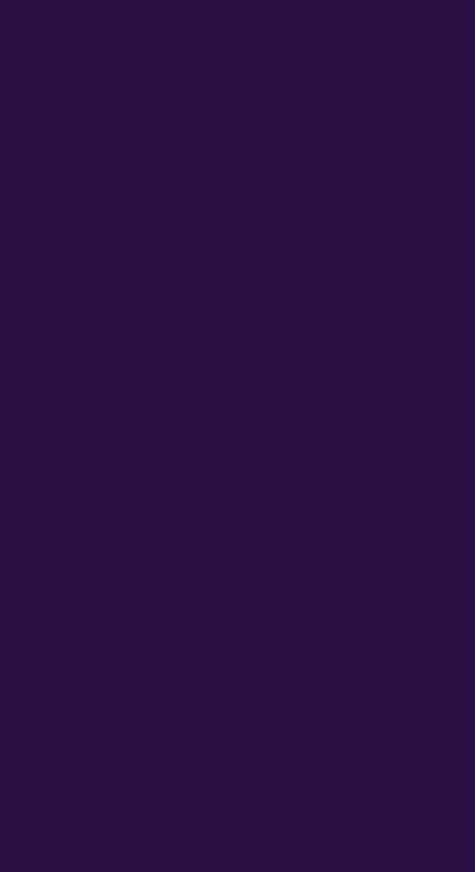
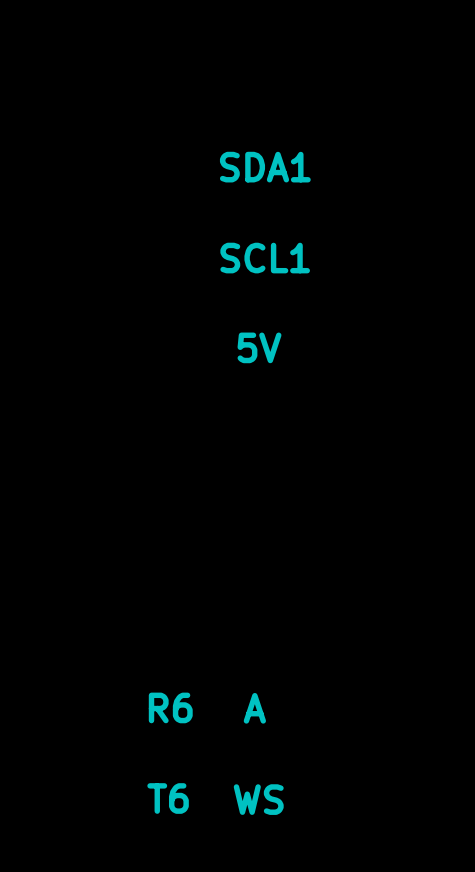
text: none -> SDA1 (265, 167)
text: none -> SCL1 (265, 258)
text: none -> 5V (259, 347)
text: none -> R6 (170, 707)
text: none -> A (254, 708)
text: none -> T6 (168, 798)
text: none -> WS (258, 799)

